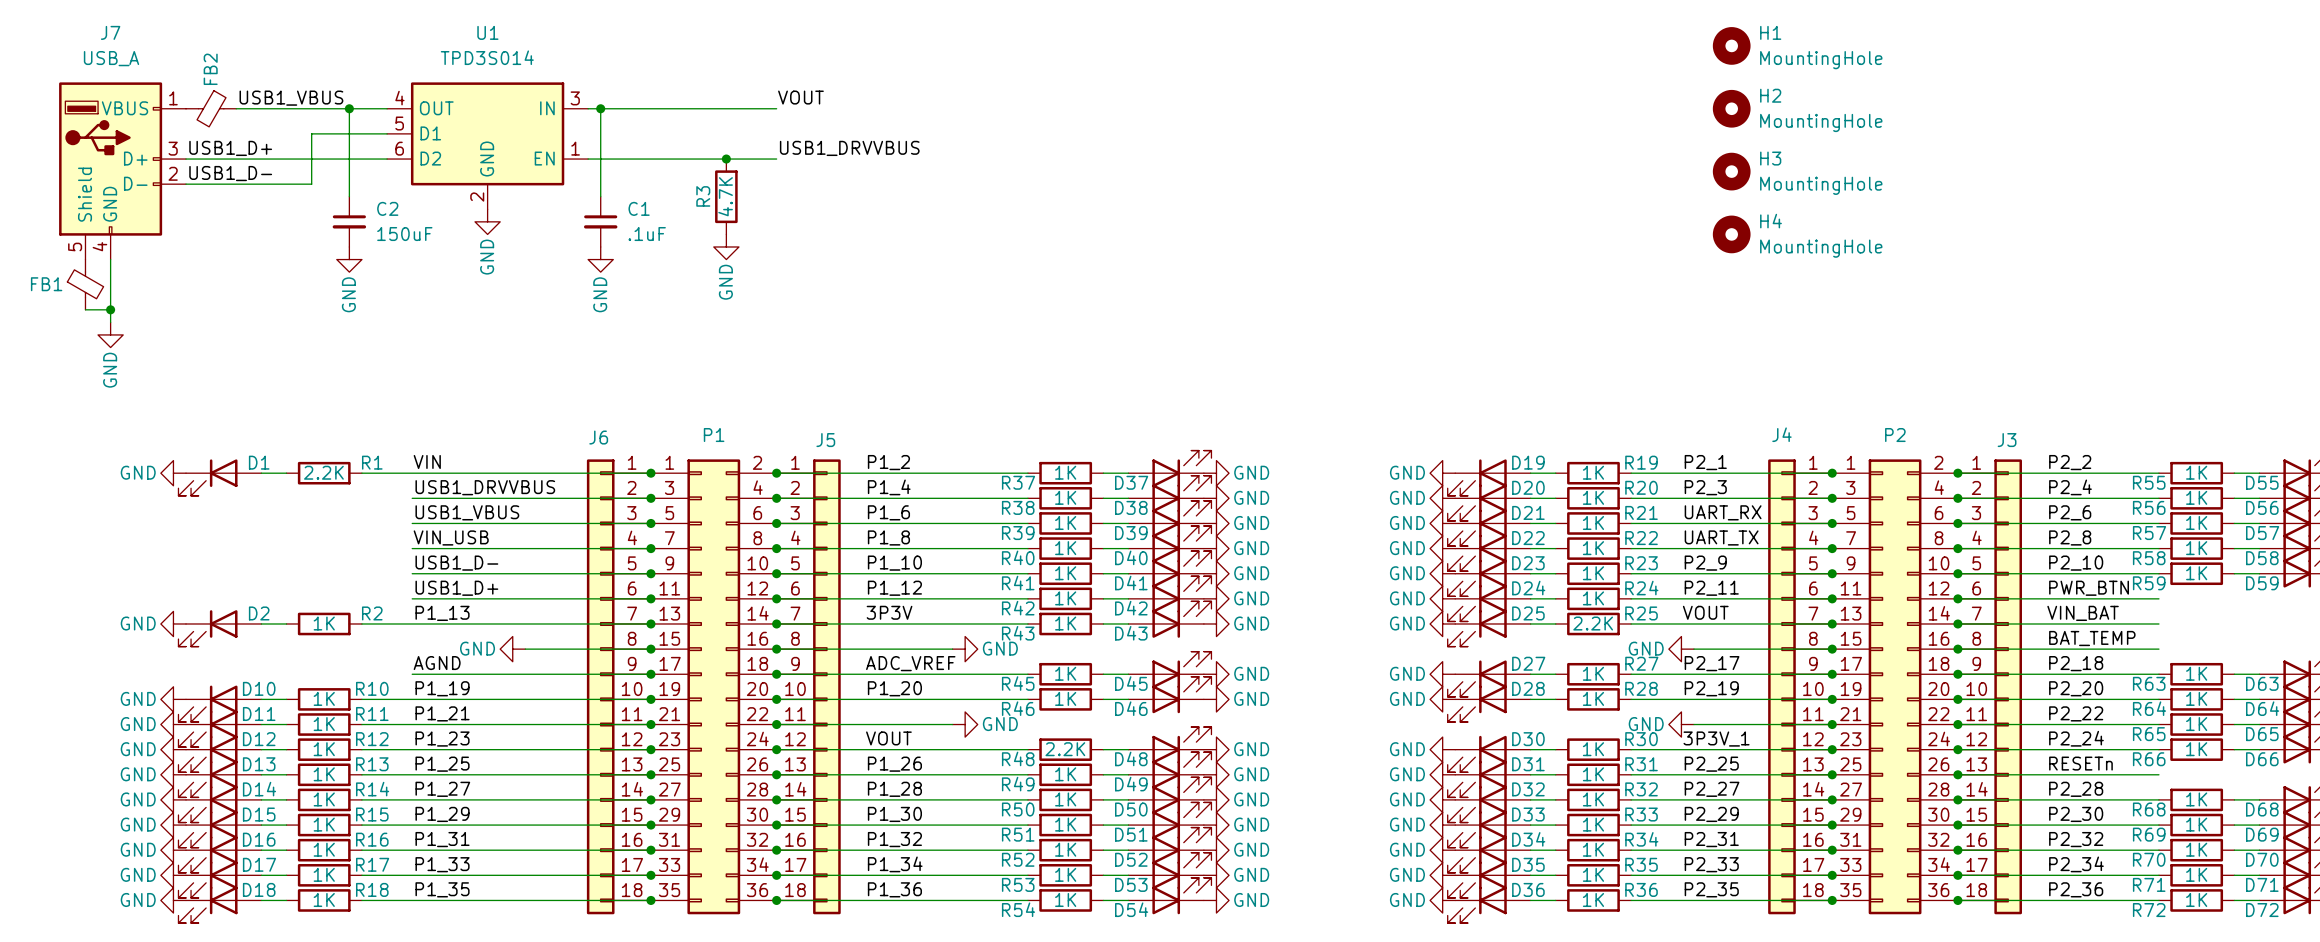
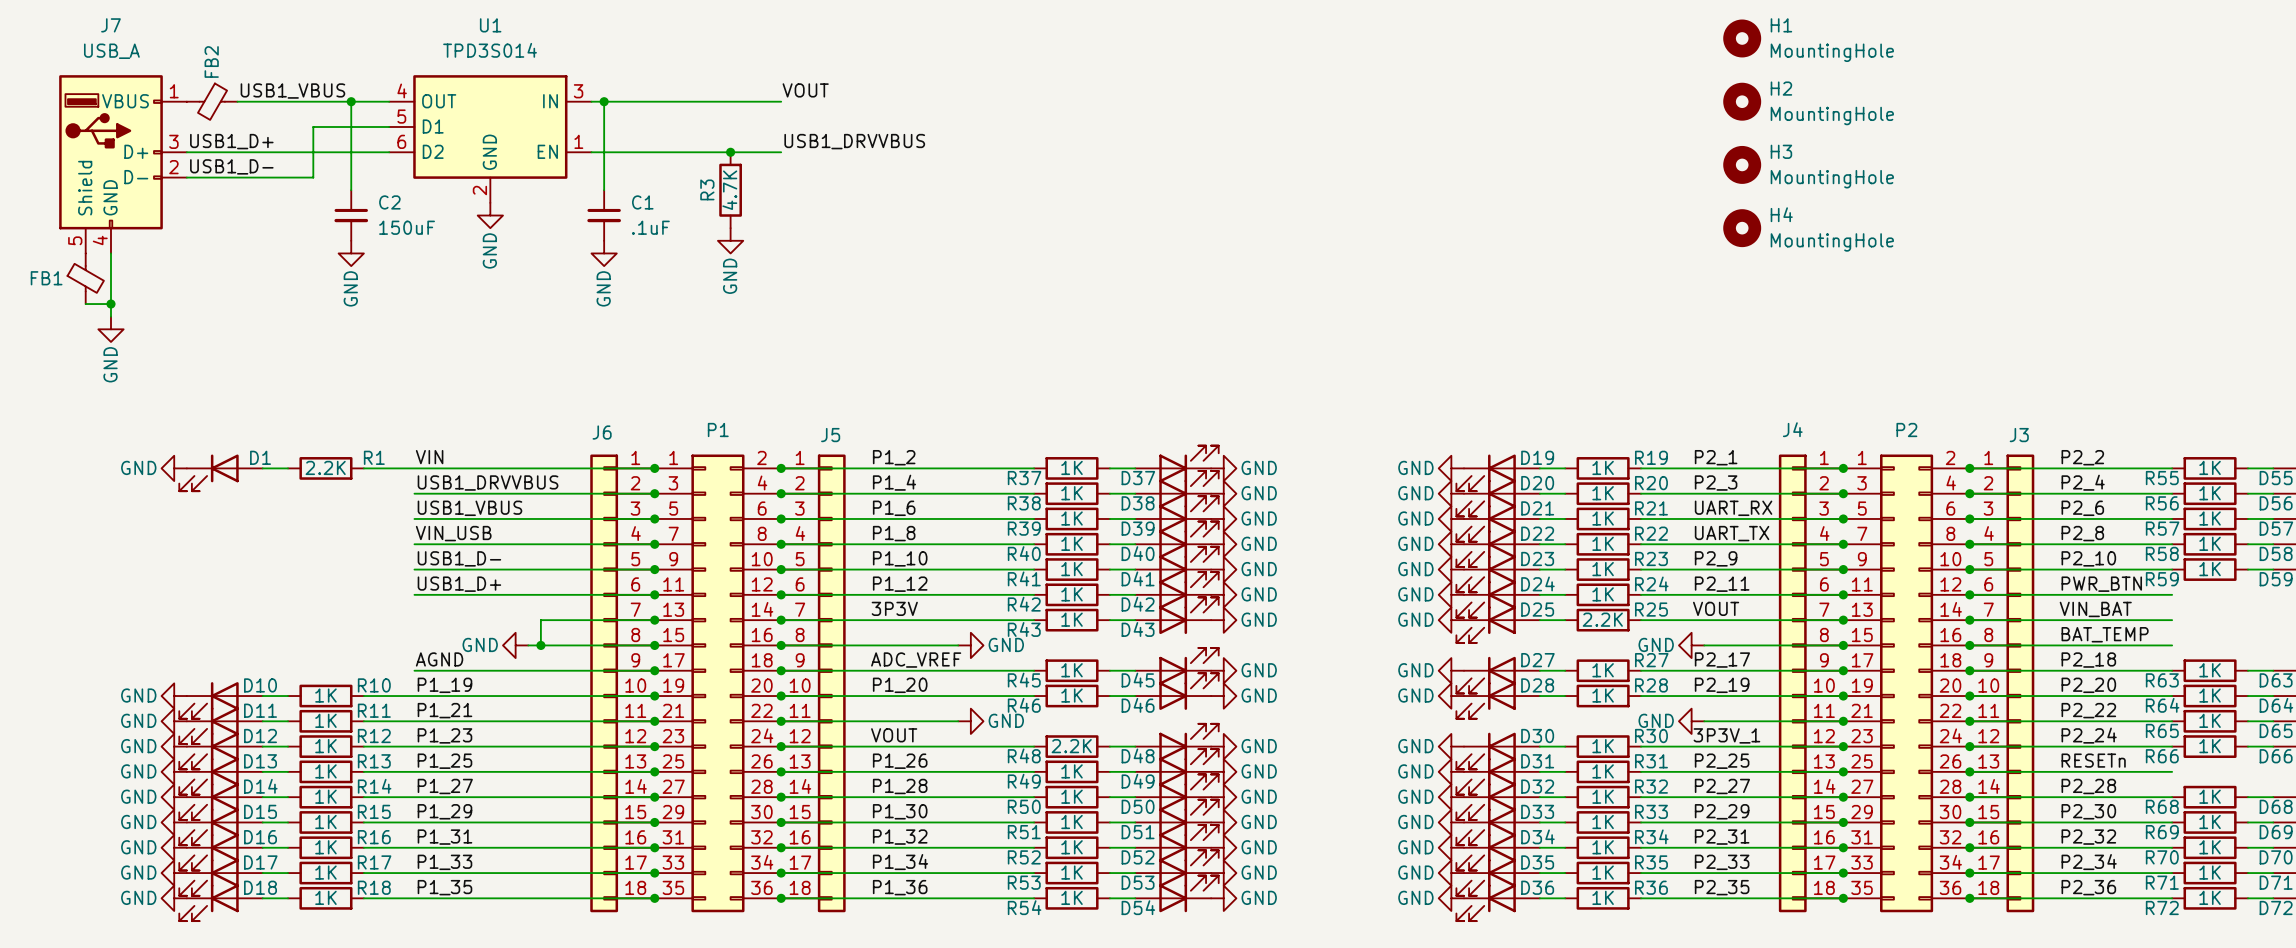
label: P1_13 (442, 613) -> none
power symbol: GND (173, 623) -> none
wire: (261, 623) (286, 623) -> none
R2: 1K (324, 623) -> none
wire: (361, 623) (537, 623) -> (540, 645) (540, 620)
D2: (219, 628) -> none
junction: none -> (540, 645)

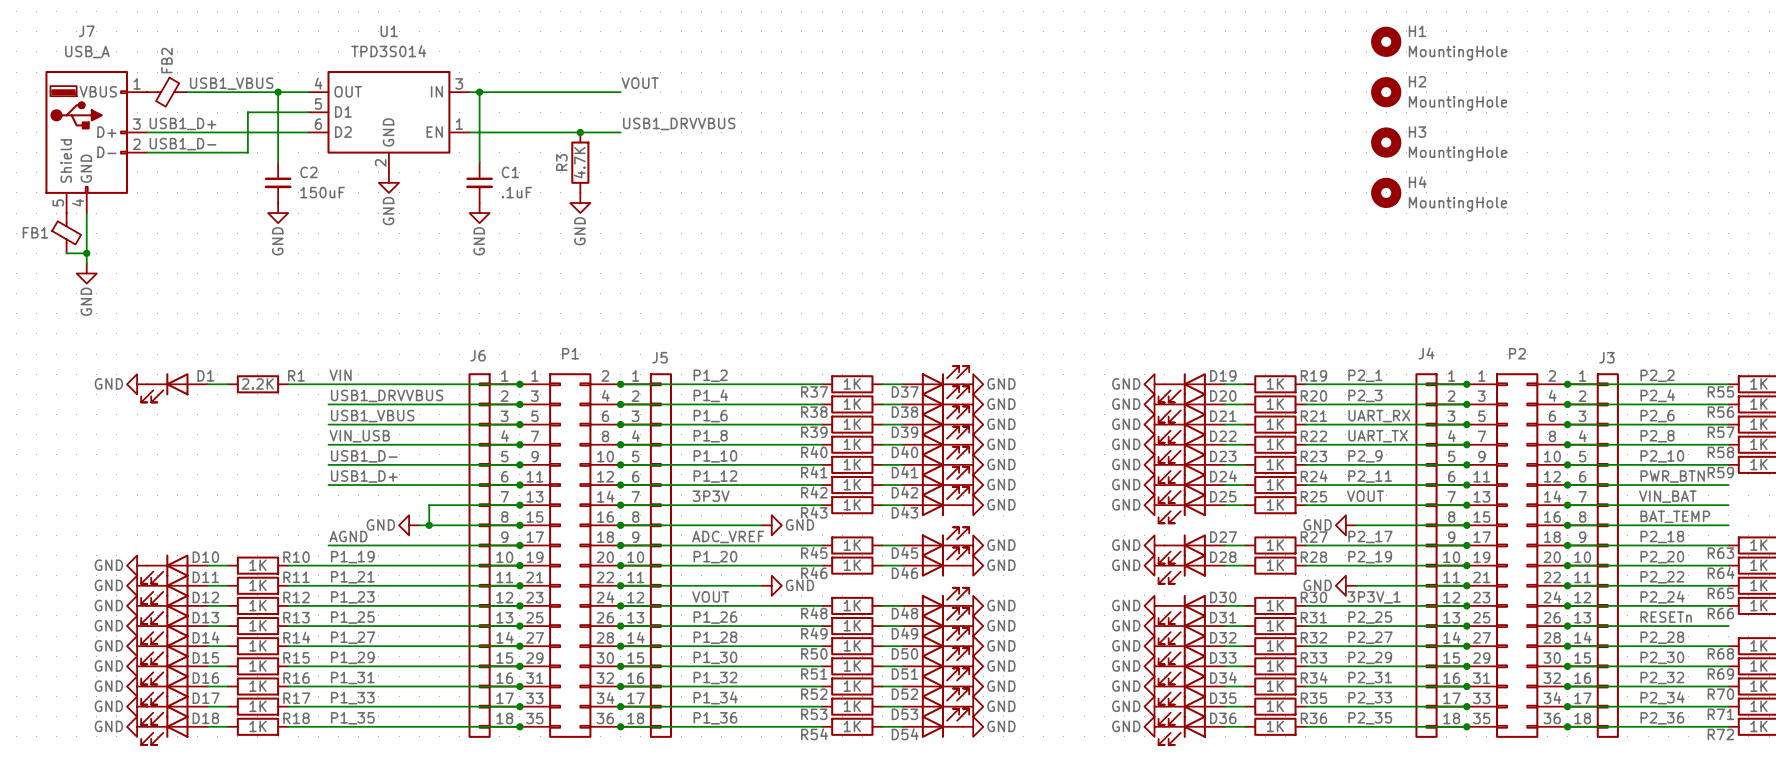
R25 value: 2.2K (1602, 619) -> 1K (1275, 504)
R48 value: 2.2K (1071, 746) -> 1K (852, 605)

